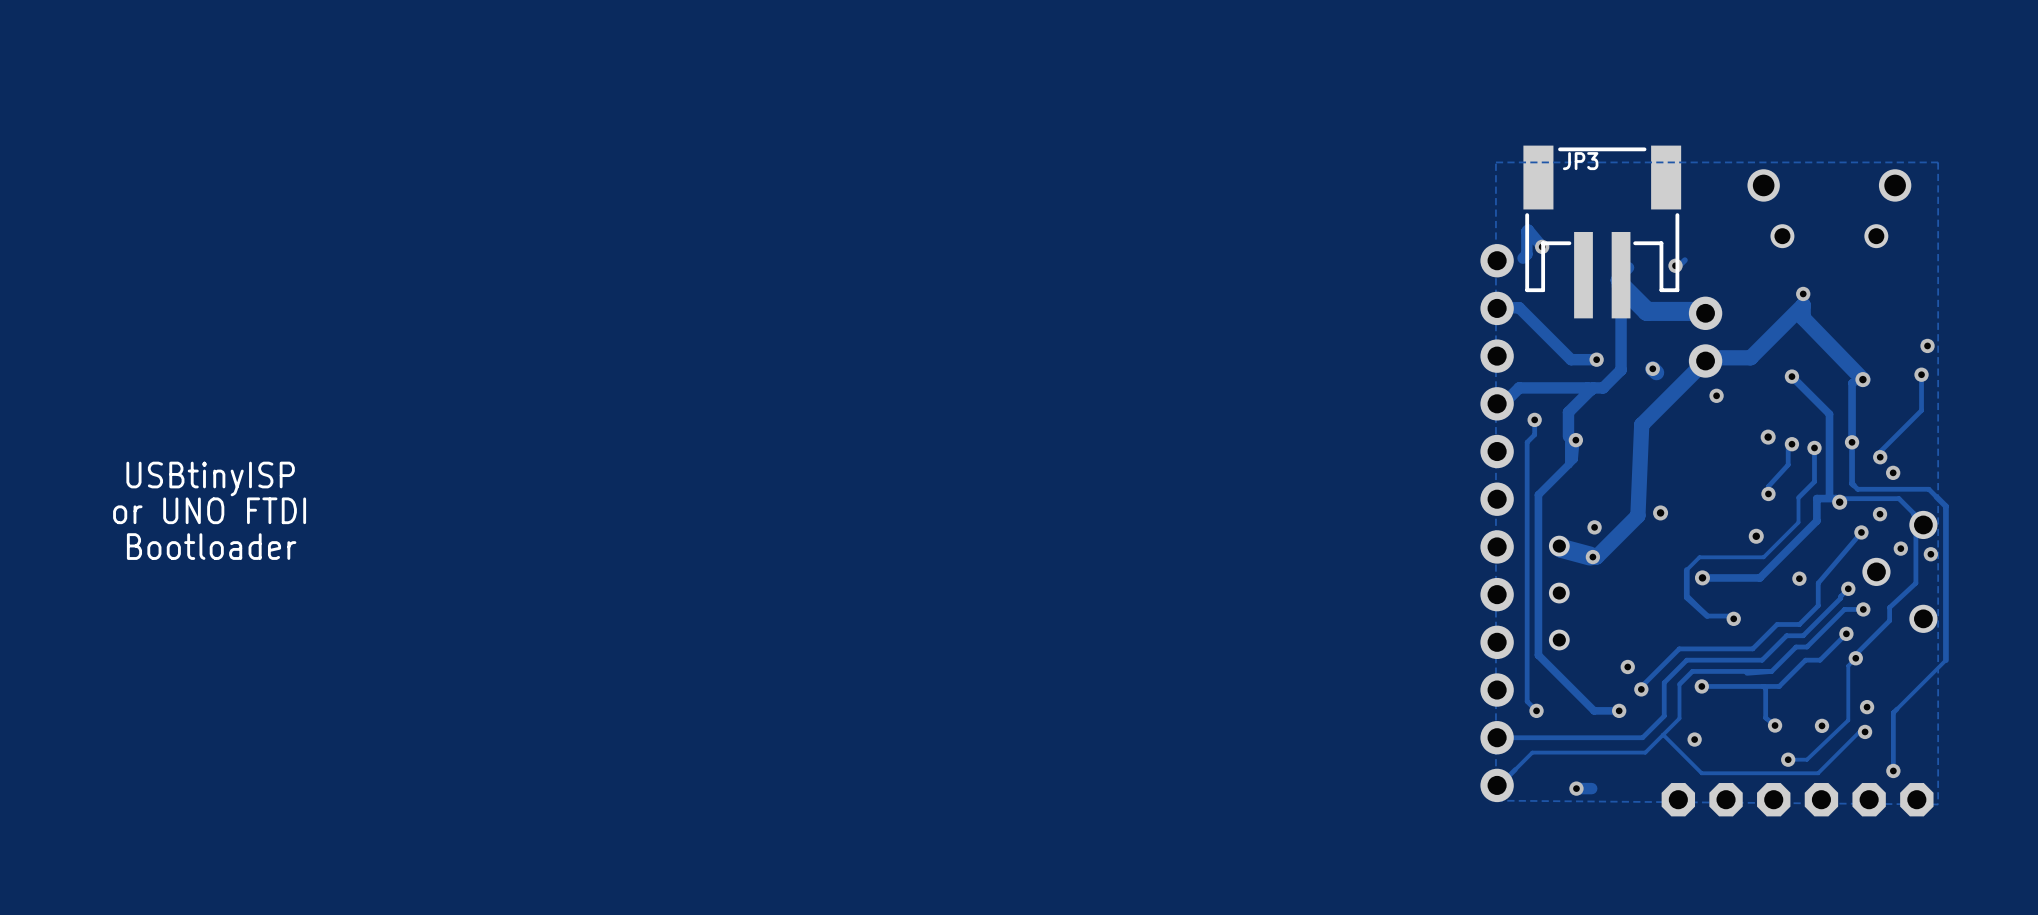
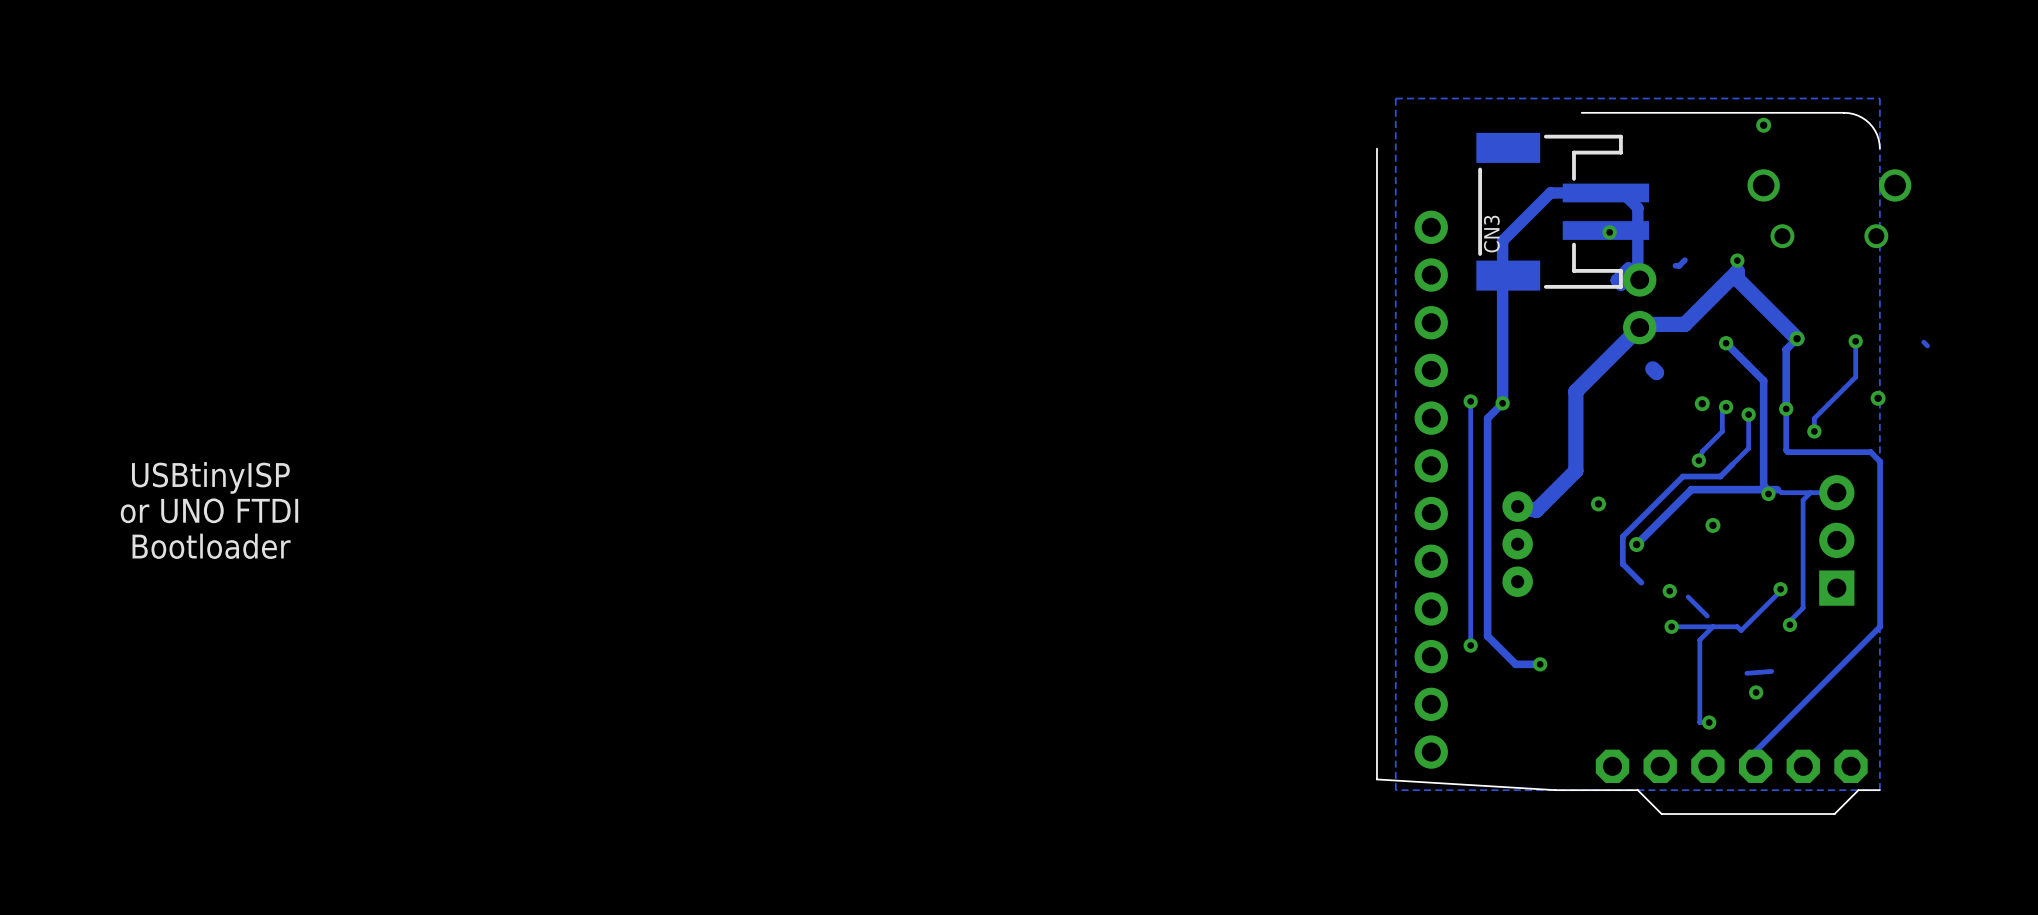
board edge: none -> (1581, 112) (1848, 113) (1862, 117) (1872, 126) (1878, 139) (1879, 148)
via: none -> (1763, 125)
board edge: none -> (1376, 148) (1376, 779) (1555, 790) (1637, 790) (1661, 814) (1834, 814) (1858, 790) (1879, 790)
zone outline: (1938, 162) (1938, 804) (1495, 800) (1495, 162) (1938, 162) -> (1879, 98) (1879, 790) (1395, 790) (1395, 98) (1879, 98)
CN3: none -> (1562, 211)
JP3: (1602, 231) -> none
via: none -> (1609, 232)
track: (1542, 246) (1528, 230) (1526, 254) (1523, 258) -> none
via: (1542, 246) -> none
via: none -> (1737, 260)
via: (1675, 265) -> none
track: none -> (1737, 271) (1737, 279) (1797, 338)
track: none -> (1737, 271) (1684, 324) (1642, 324) (1575, 391) (1575, 470) (1536, 510) (1517, 506)
track: none -> (1639, 279) (1637, 278) (1637, 208) (1624, 194) (1550, 192) (1502, 240) (1502, 403) (1487, 418) (1487, 636) (1515, 664) (1540, 664)
via: (1803, 293) -> none
track: (1803, 305) (1750, 357) (1708, 357) (1641, 424) (1637, 515) (1596, 557) (1561, 548) (1559, 546) -> none
track: (1803, 305) (1803, 318) (1862, 379) -> none
track: (1497, 308) (1519, 307) (1571, 359) (1596, 359) -> none
track: (1705, 313) (1703, 311) (1646, 311) (1621, 285) (1621, 370) (1603, 387) (1592, 387) (1568, 412) (1568, 464) -> none
part position: (1705, 337) -> (1639, 303)
track: none -> (1797, 338) (1786, 349) (1786, 450) (1788, 452) (1870, 452) (1880, 461) (1880, 626) (1756, 750) (1755, 766)
via: none -> (1797, 338)
track: none -> (1855, 341) (1855, 377) (1814, 418) (1814, 431)
via: none -> (1855, 341)
track: none -> (1726, 343) (1763, 380) (1763, 485) (1767, 489)
via: none -> (1726, 343)
via: (1927, 345) -> none
via: (1596, 359) -> none
via: (1652, 368) -> none
track: (1921, 374) (1921, 410) (1880, 451) (1880, 457) -> none
via: (1921, 374) -> none
track: (1791, 376) (1829, 414) (1829, 496) (1836, 498) -> none
via: (1791, 376) -> none
track: (1862, 379) (1852, 382) (1852, 483) (1857, 489) (1928, 489) (1945, 506) (1945, 660) (1893, 712) (1893, 770) -> none
via position: (1862, 379) -> (1878, 398)
track: (1590, 390) (1587, 387) (1519, 387) (1503, 403) (1497, 403) -> none
via position: (1716, 395) -> (1726, 407)
track: none -> (1470, 401) (1470, 645)
via: none -> (1470, 401)
via: none -> (1502, 403)
via: none -> (1702, 403)
track: none -> (1726, 407) (1722, 410) (1722, 431) (1702, 451) (1698, 460)
via: none -> (1786, 408)
track: none -> (1748, 414) (1748, 448) (1720, 476) (1682, 476) (1622, 536) (1622, 564) (1641, 582)
via: none -> (1748, 414)
track: (1534, 419) (1534, 434) (1527, 442) (1527, 701) (1536, 710) -> none
via: (1534, 419) -> none
via: none -> (1814, 431)
via: (1768, 437) -> none
track: (1575, 440) (1574, 459) (1538, 494) (1538, 655) (1594, 710) (1619, 710) -> none
via: (1575, 440) -> none
via: (1852, 442) -> none
track: (1791, 444) (1788, 444) (1788, 464) (1768, 486) (1768, 493) -> none
via: (1791, 444) -> none
track: (1814, 447) (1814, 481) (1798, 497) (1798, 522) (1763, 557) (1699, 557) (1686, 570) (1686, 597) (1707, 616) (1730, 616) (1733, 618) -> none
via: (1814, 447) -> none
via: (1880, 457) -> none
via: none -> (1698, 460)
via: (1893, 472) -> none
track: none -> (1810, 492) (1803, 500) (1803, 608) (1789, 621) (1789, 624)
track: none -> (1836, 492) (1781, 492) (1777, 489) (1691, 489) (1636, 544)
track: (1836, 498) (1816, 498) (1816, 520) (1759, 577) (1702, 577) -> none
track: (1836, 498) (1839, 502) (1843, 498) (1898, 498) (1914, 513) (1923, 524) (1915, 534) (1915, 583) (1889, 607) (1889, 620) (1855, 654) (1855, 658) (1848, 665) (1848, 720) (1806, 759) (1788, 759) -> none
via: (1839, 502) -> none
via: none -> (1598, 503)
via: (1660, 512) -> none
via: (1880, 514) -> none
part position: (1497, 523) -> (1431, 489)
via: none -> (1712, 525)
via: (1594, 527) -> none
track: (1861, 532) (1818, 583) (1818, 605) (1799, 624) (1777, 624) (1752, 648) (1679, 648) (1641, 686) (1641, 689) -> none
via: (1861, 532) -> none
via: (1756, 536) -> none
part: none -> (1836, 540)
part: none -> (1517, 544)
via: none -> (1636, 544)
via: (1900, 548) -> none
via: (1930, 554) -> none
via: (1592, 557) -> none
part: (1899, 571) -> none
via: (1702, 577) -> none
via position: (1799, 578) -> (1780, 589)
track: (1848, 588) (1803, 635) (1786, 635) (1762, 660) (1686, 660) (1664, 682) (1664, 716) (1642, 737) (1497, 737) -> none
via: (1848, 588) -> none
track: none -> (1780, 589) (1741, 630) (1737, 626) (1671, 626)
via: none -> (1669, 591)
part: (1559, 593) -> none
track: (1863, 609) (1844, 609) (1806, 647) (1796, 647) (1771, 671) (1692, 671) (1679, 684) (1679, 718) (1645, 752) (1532, 752) (1499, 785) (1497, 785) -> none
via: (1863, 609) -> none
via: (1733, 618) -> none
via: none -> (1789, 624)
via: none -> (1671, 626)
track: none -> (1712, 626) (1699, 639) (1699, 722) (1709, 722)
track: (1846, 633) (1820, 660) (1805, 660) (1779, 686) (1701, 686) -> none
via: (1846, 633) -> none
via: none -> (1470, 645)
via: (1855, 658) -> none
via: none -> (1540, 664)
via: (1627, 666) -> none
via: (1701, 686) -> none
track: (1763, 686) (1765, 688) (1765, 717) (1775, 725) -> none
via: (1641, 689) -> none
via: none -> (1756, 692)
via: (1867, 707) -> none
via: (1536, 710) -> none
via: (1619, 710) -> none
via: none -> (1709, 722)
via: (1775, 725) -> none
via: (1822, 725) -> none
track: (1865, 731) (1859, 731) (1818, 773) (1701, 773) (1663, 734) -> none
via: (1865, 731) -> none
via: (1694, 739) -> none
via: (1788, 759) -> none
via: (1893, 770) -> none
via: (1576, 788) -> none
track: (1591, 788) (1576, 788) -> none
part position: (1797, 799) -> (1731, 766)

